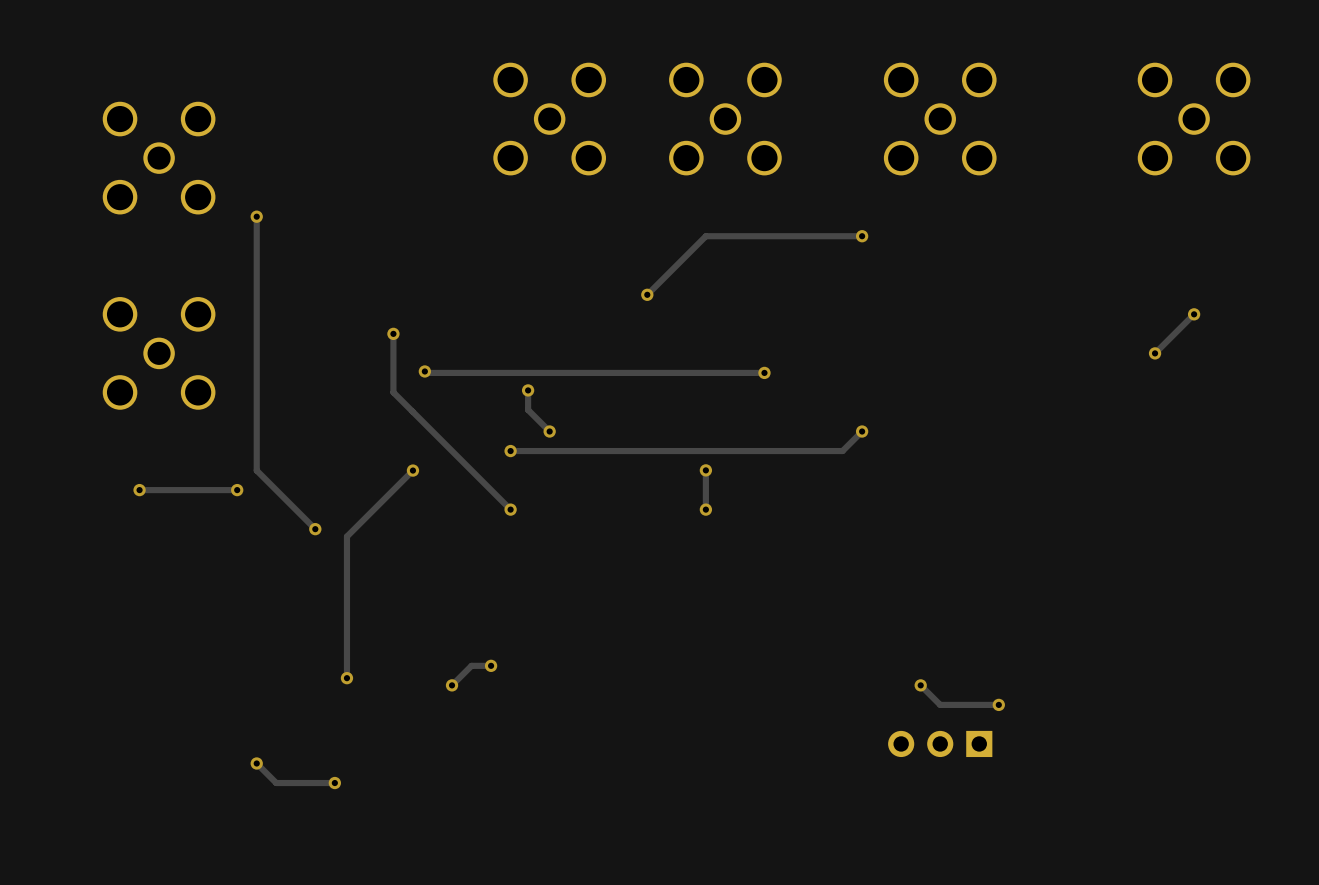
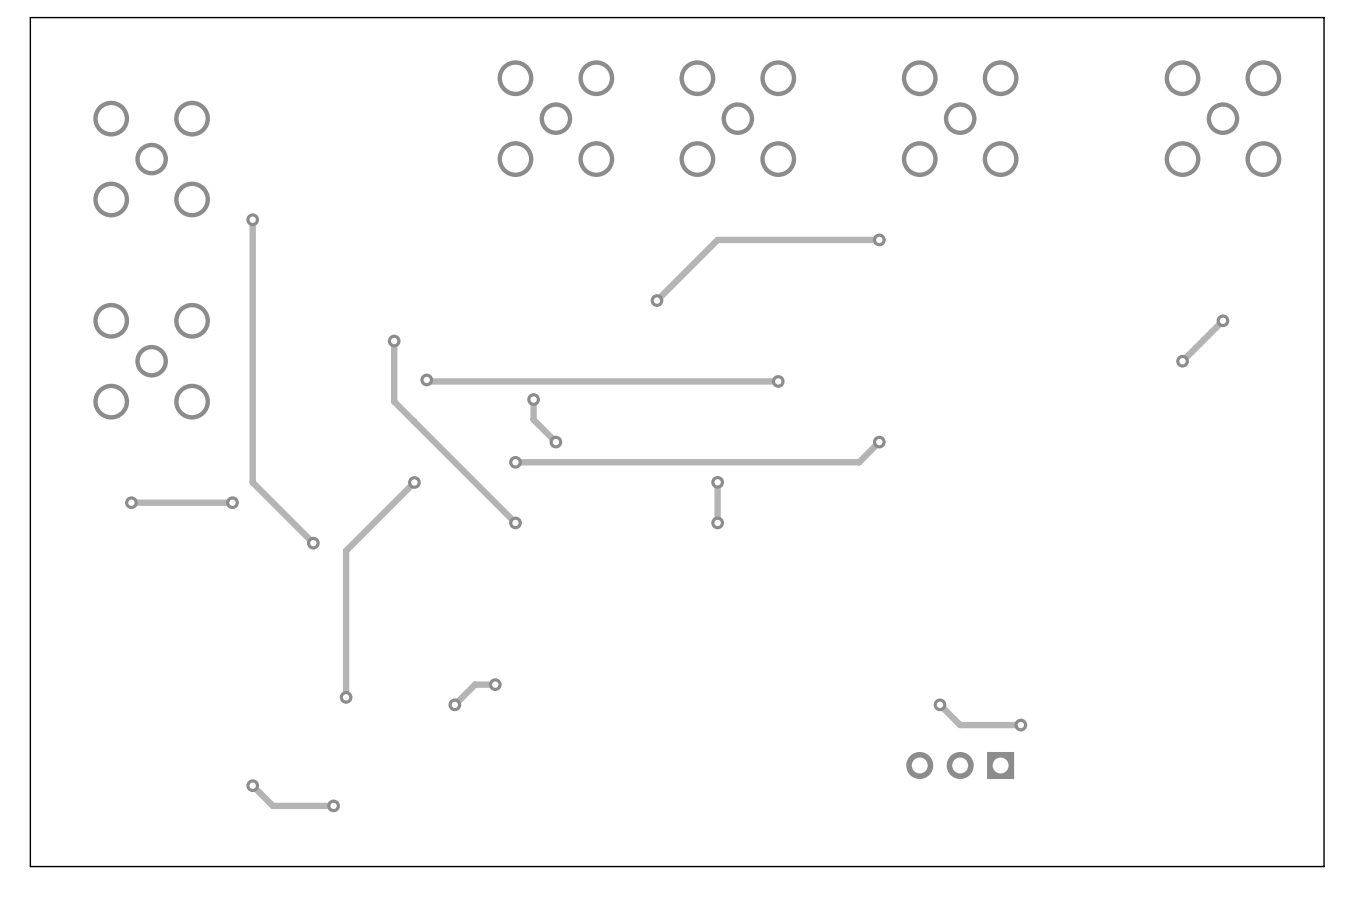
board edge: none -> (1324, 17) (30, 17) (30, 866) (1324, 866) (1324, 17)

